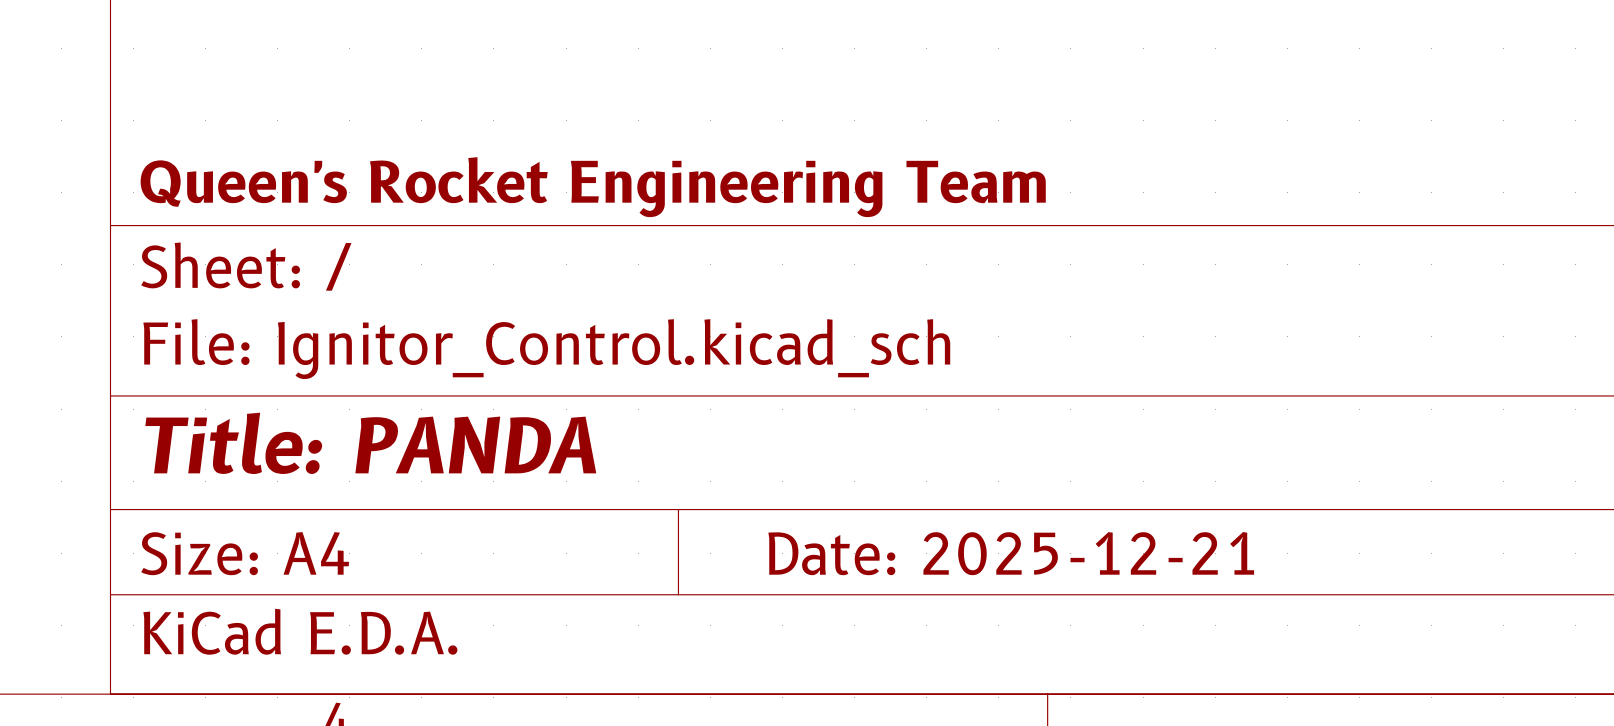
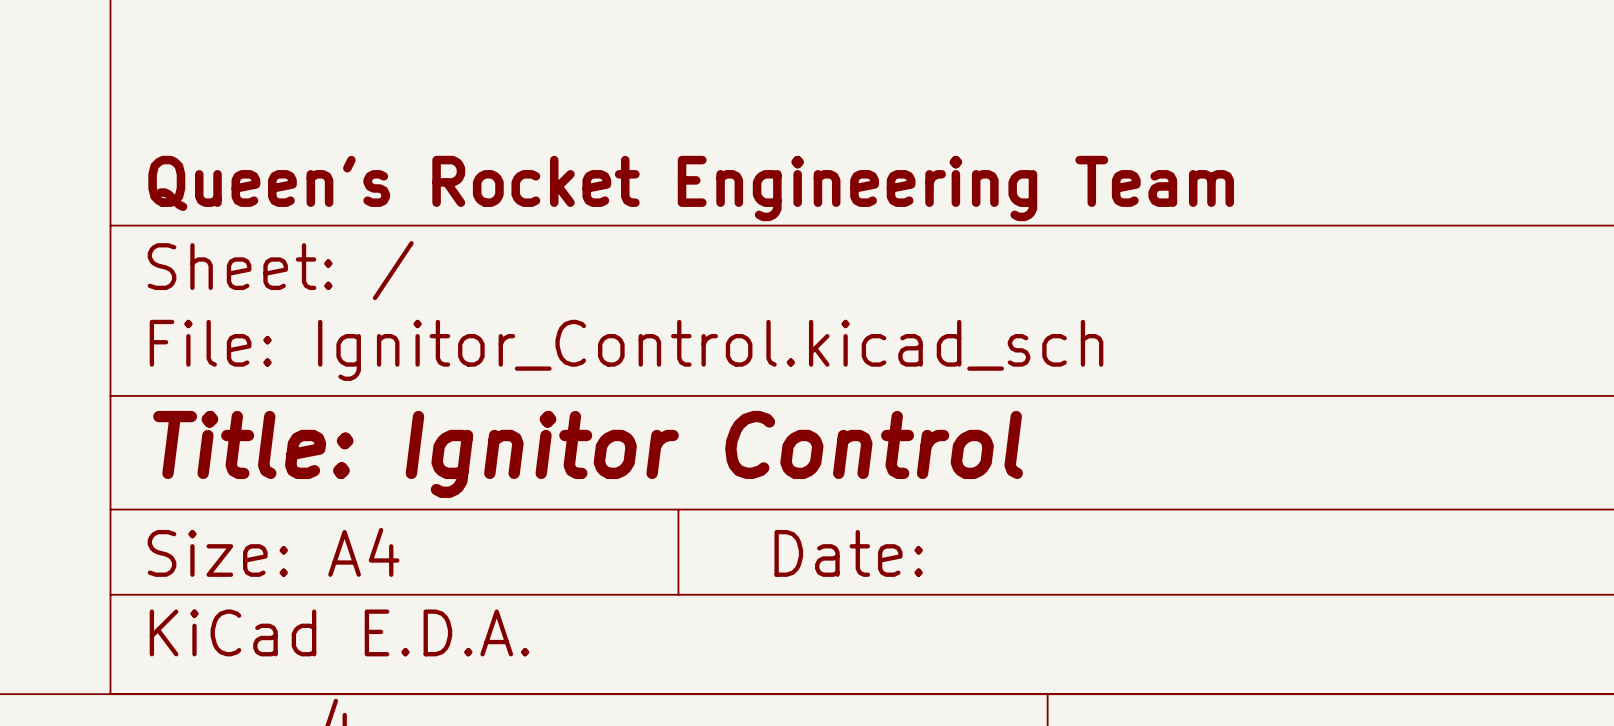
title block: Title: PANDA (370, 443) -> Title: Ignitor Control (588, 454)
title block: Date: 2025-12-21 (1011, 553) -> Date: (848, 553)

